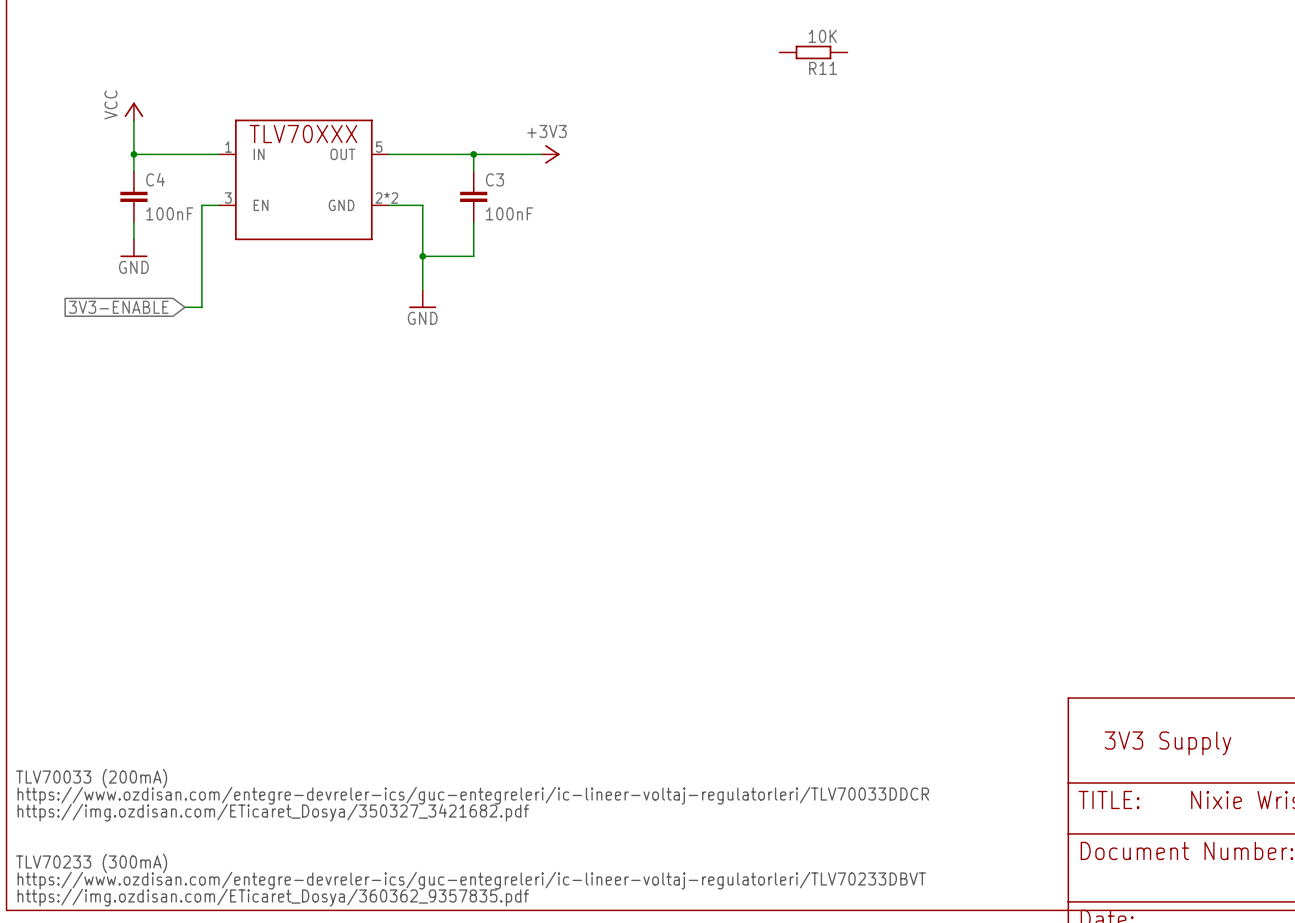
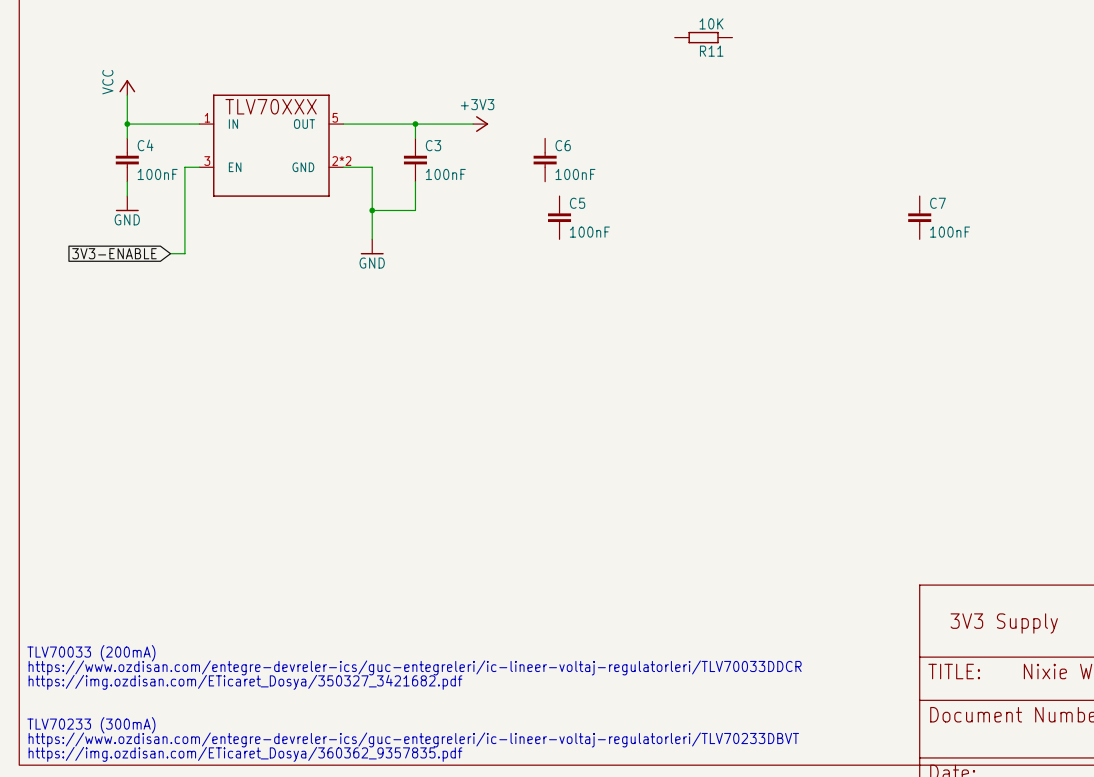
C6: none -> 100nF (545, 160)
C5: none -> 100nF (559, 217)
C7: none -> 100nF (919, 217)

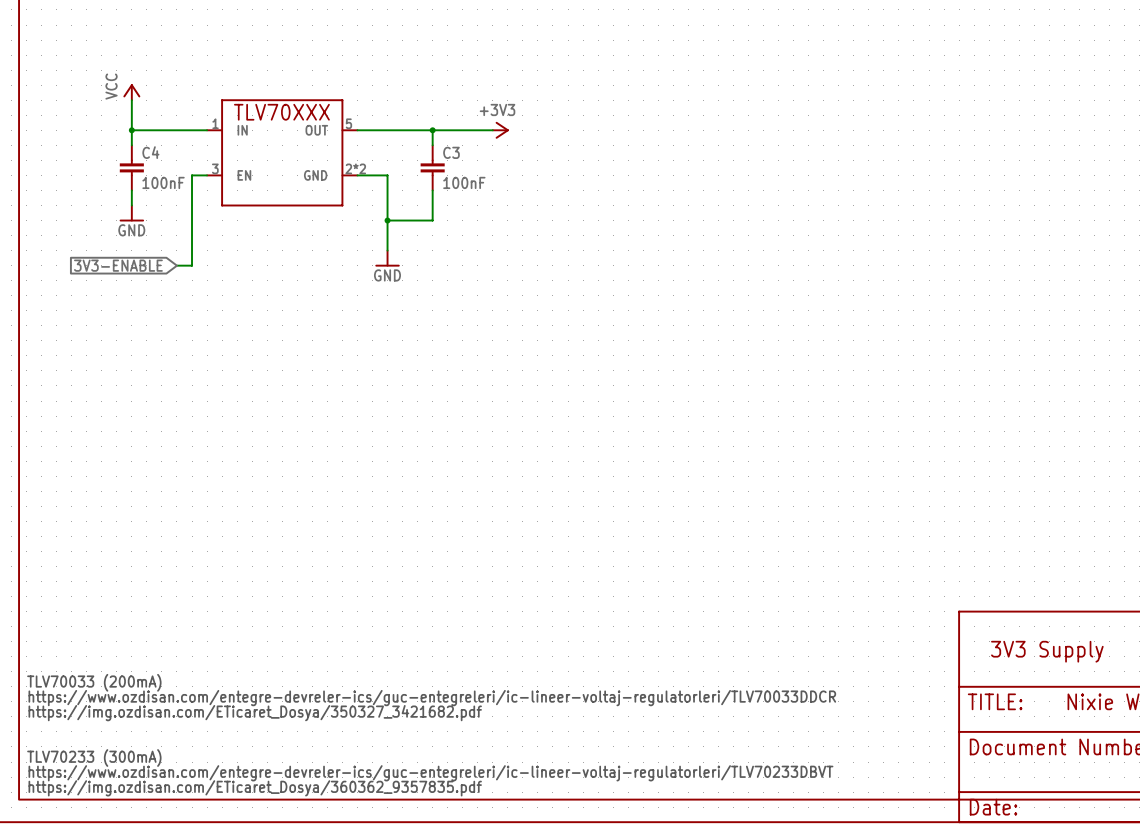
R11: 10K (703, 37) -> none
C6: 100nF (545, 160) -> none
C5: 100nF (559, 217) -> none
C7: 100nF (919, 217) -> none

